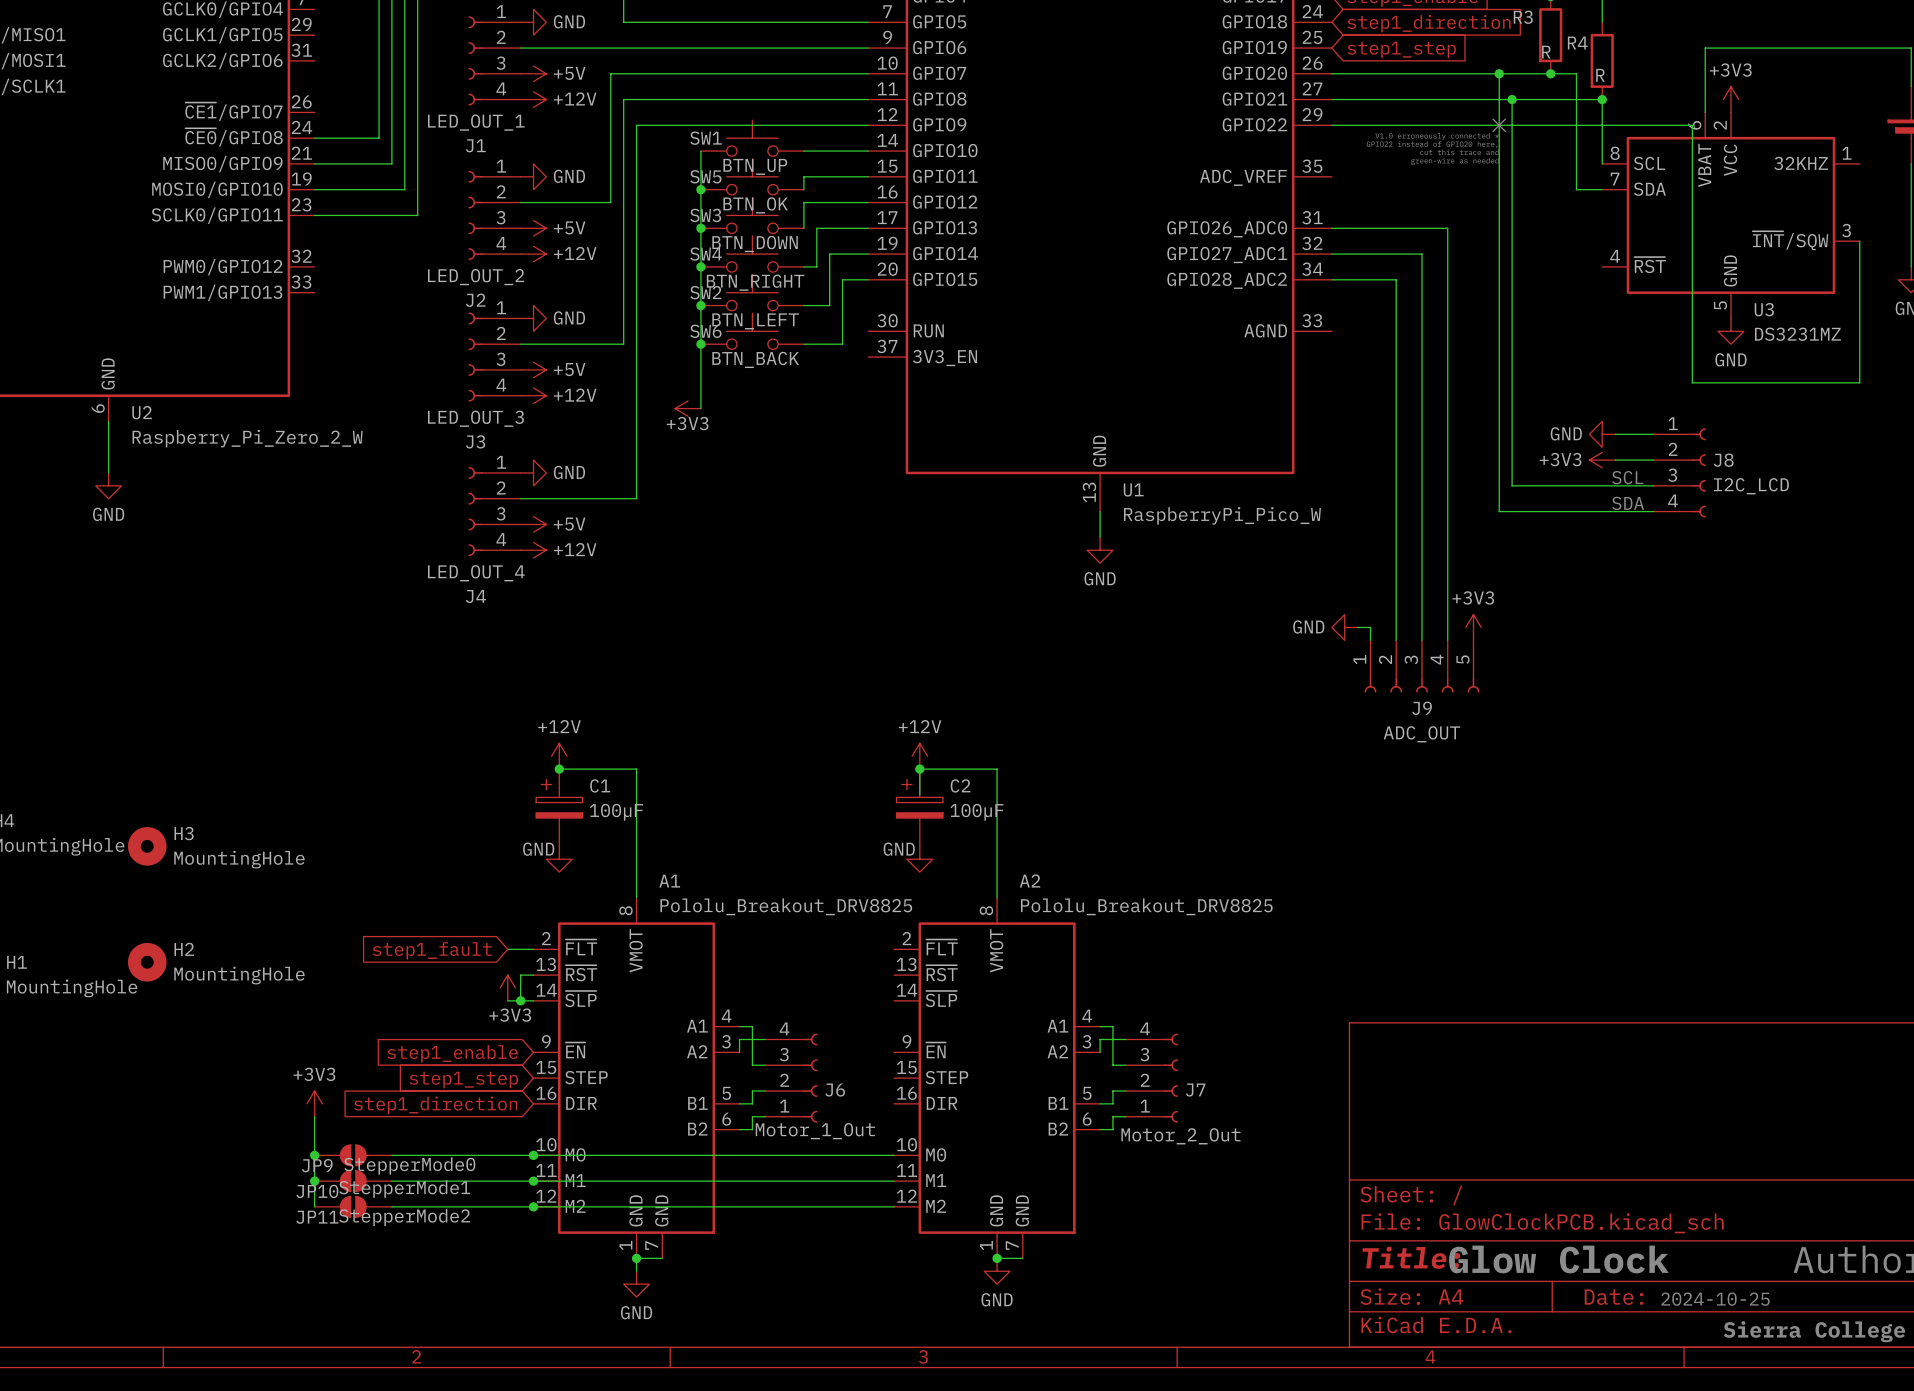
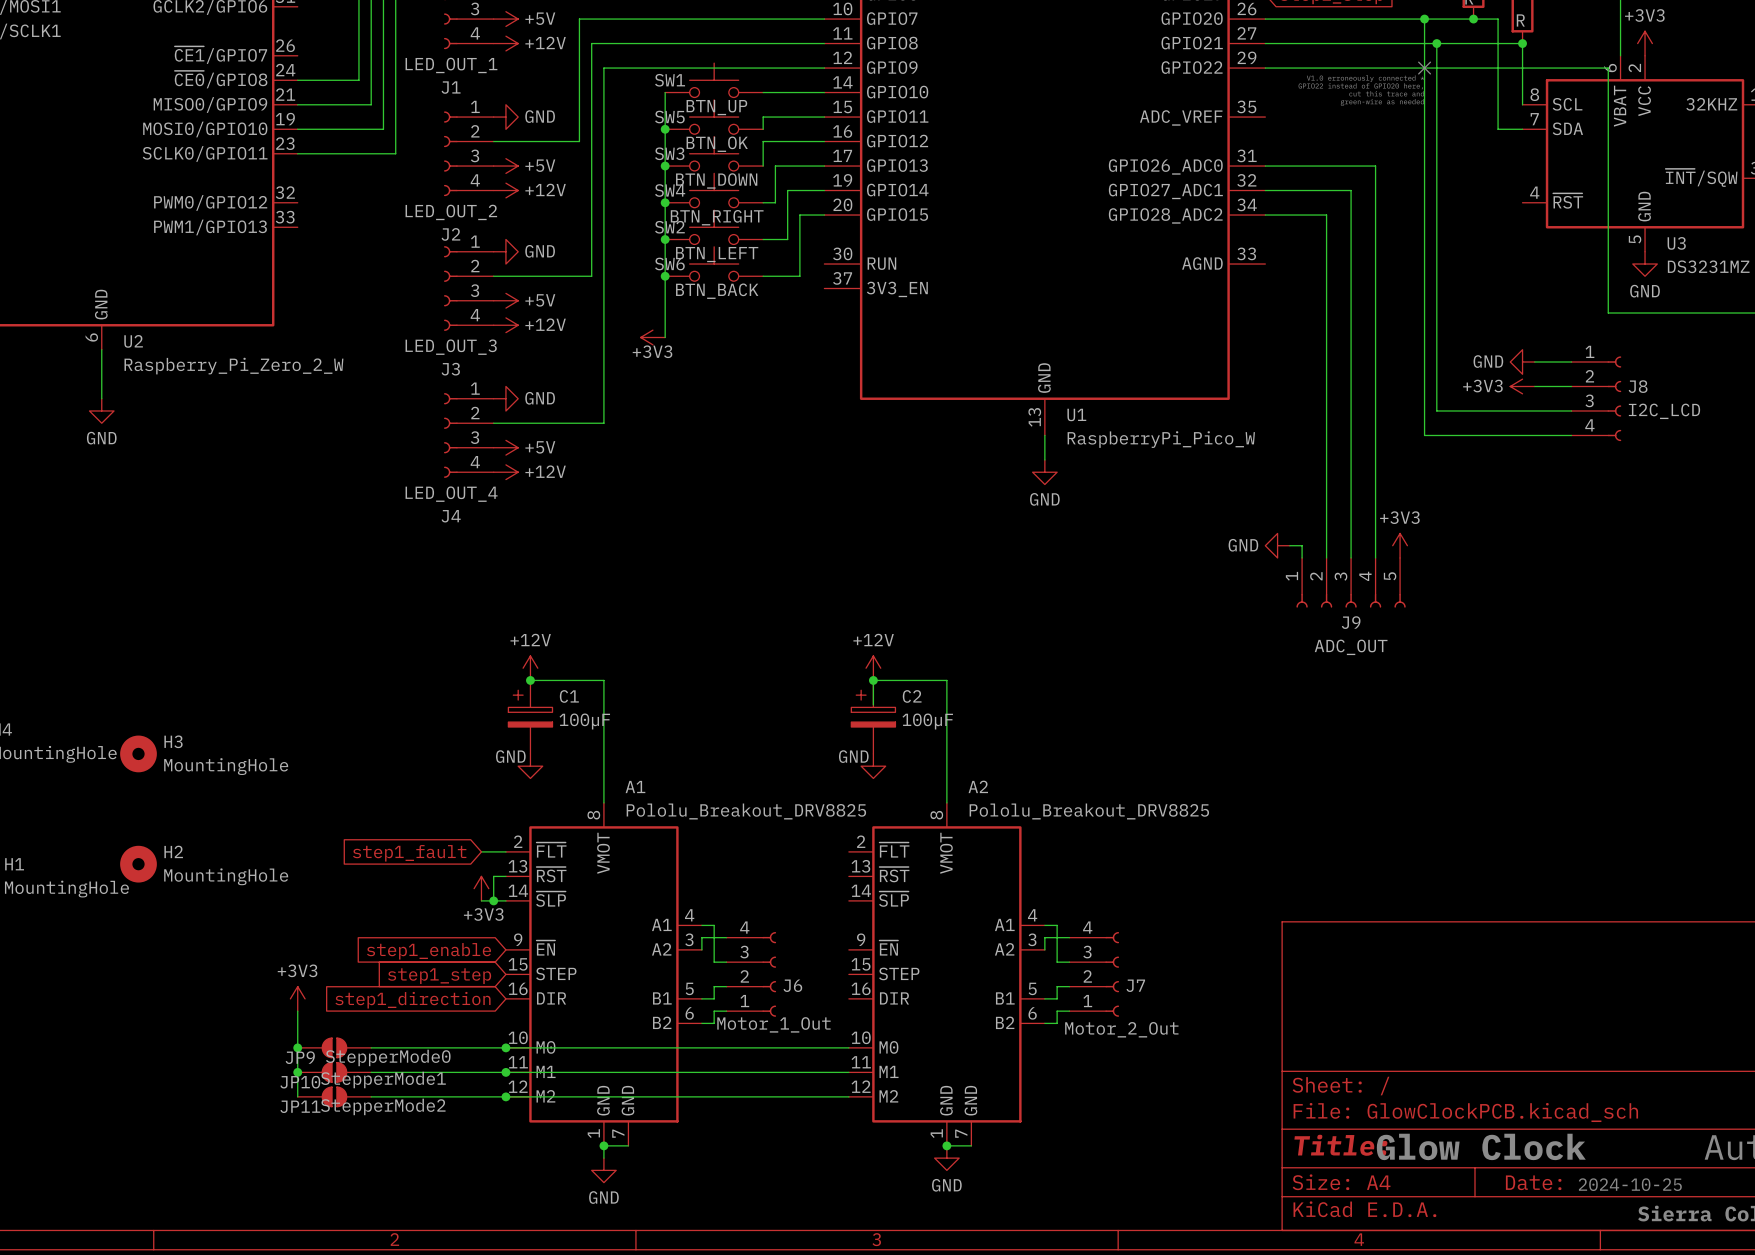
text: SCL (1627, 477) -> none
text: SDA (1628, 503) -> none

